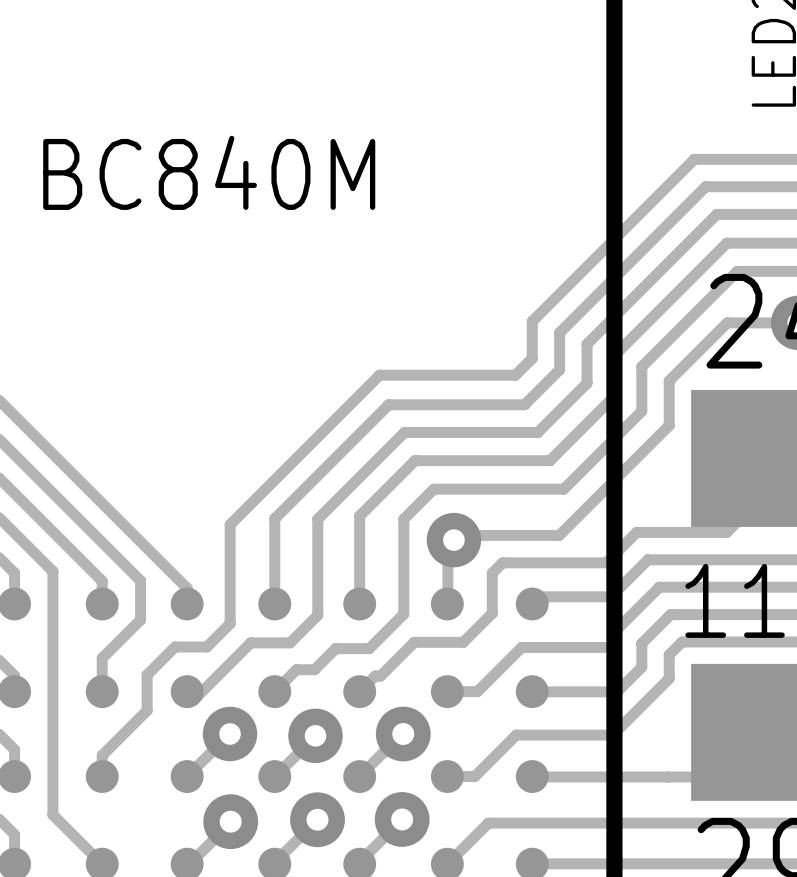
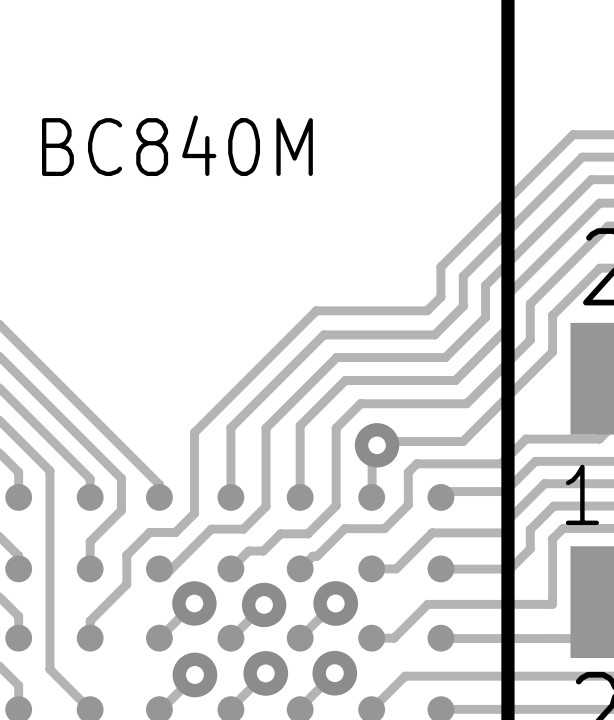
track: (669, 678) (612, 735) -> (552, 558) (552, 603)
track: none -> (506, 604) (552, 604)

